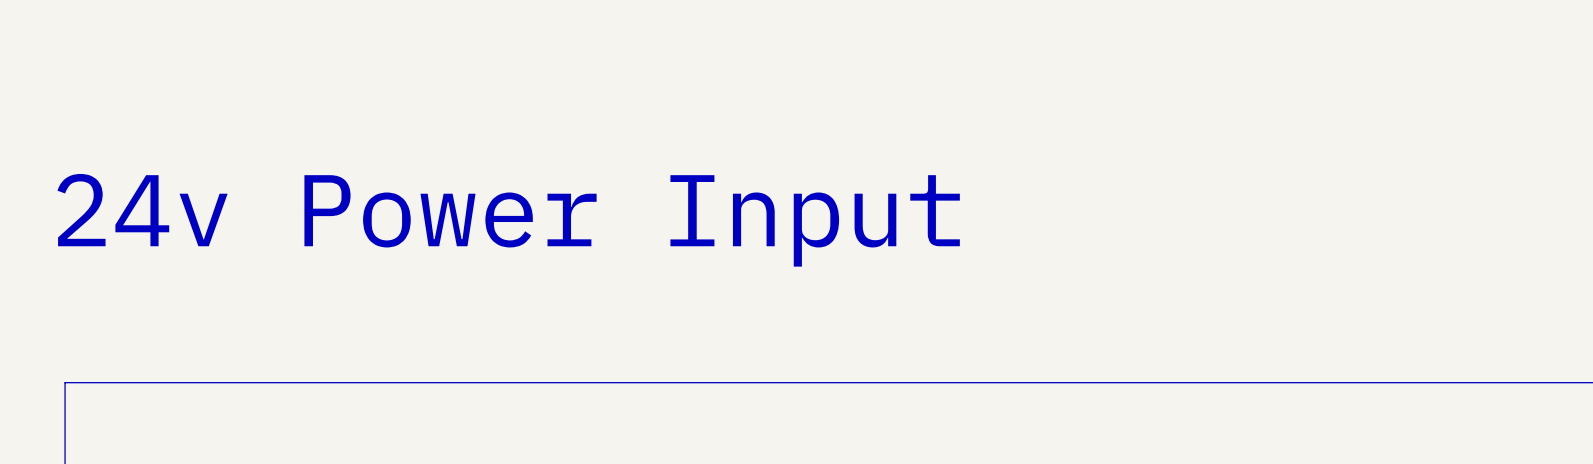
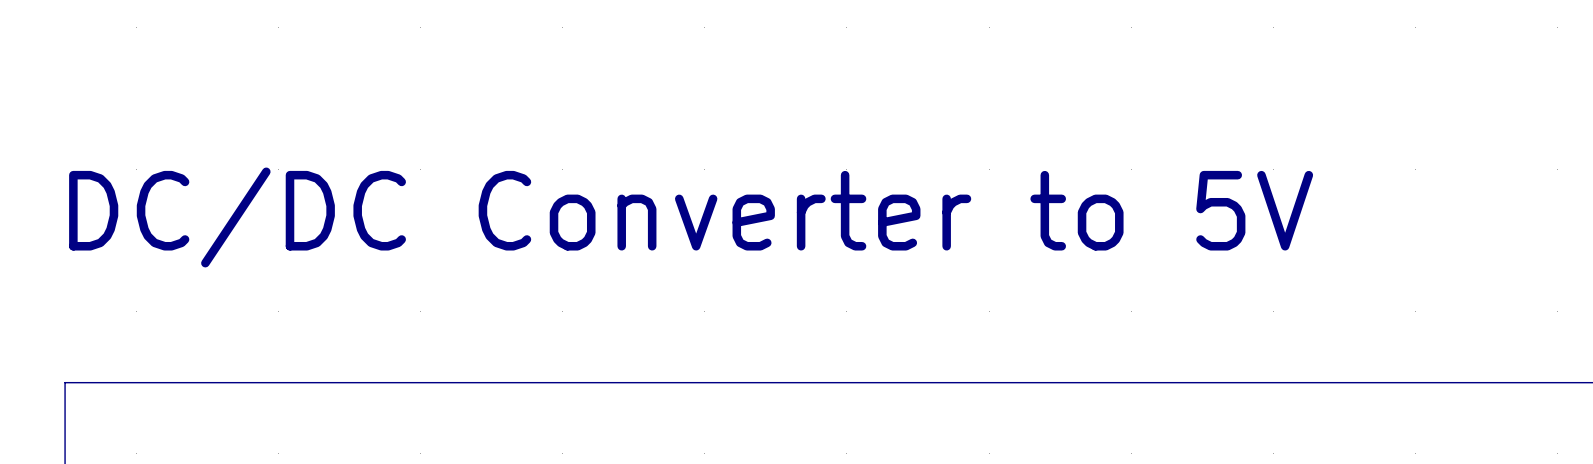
text: 24v Power Input (508, 220) -> DC/DC Converter to 5V (691, 217)

